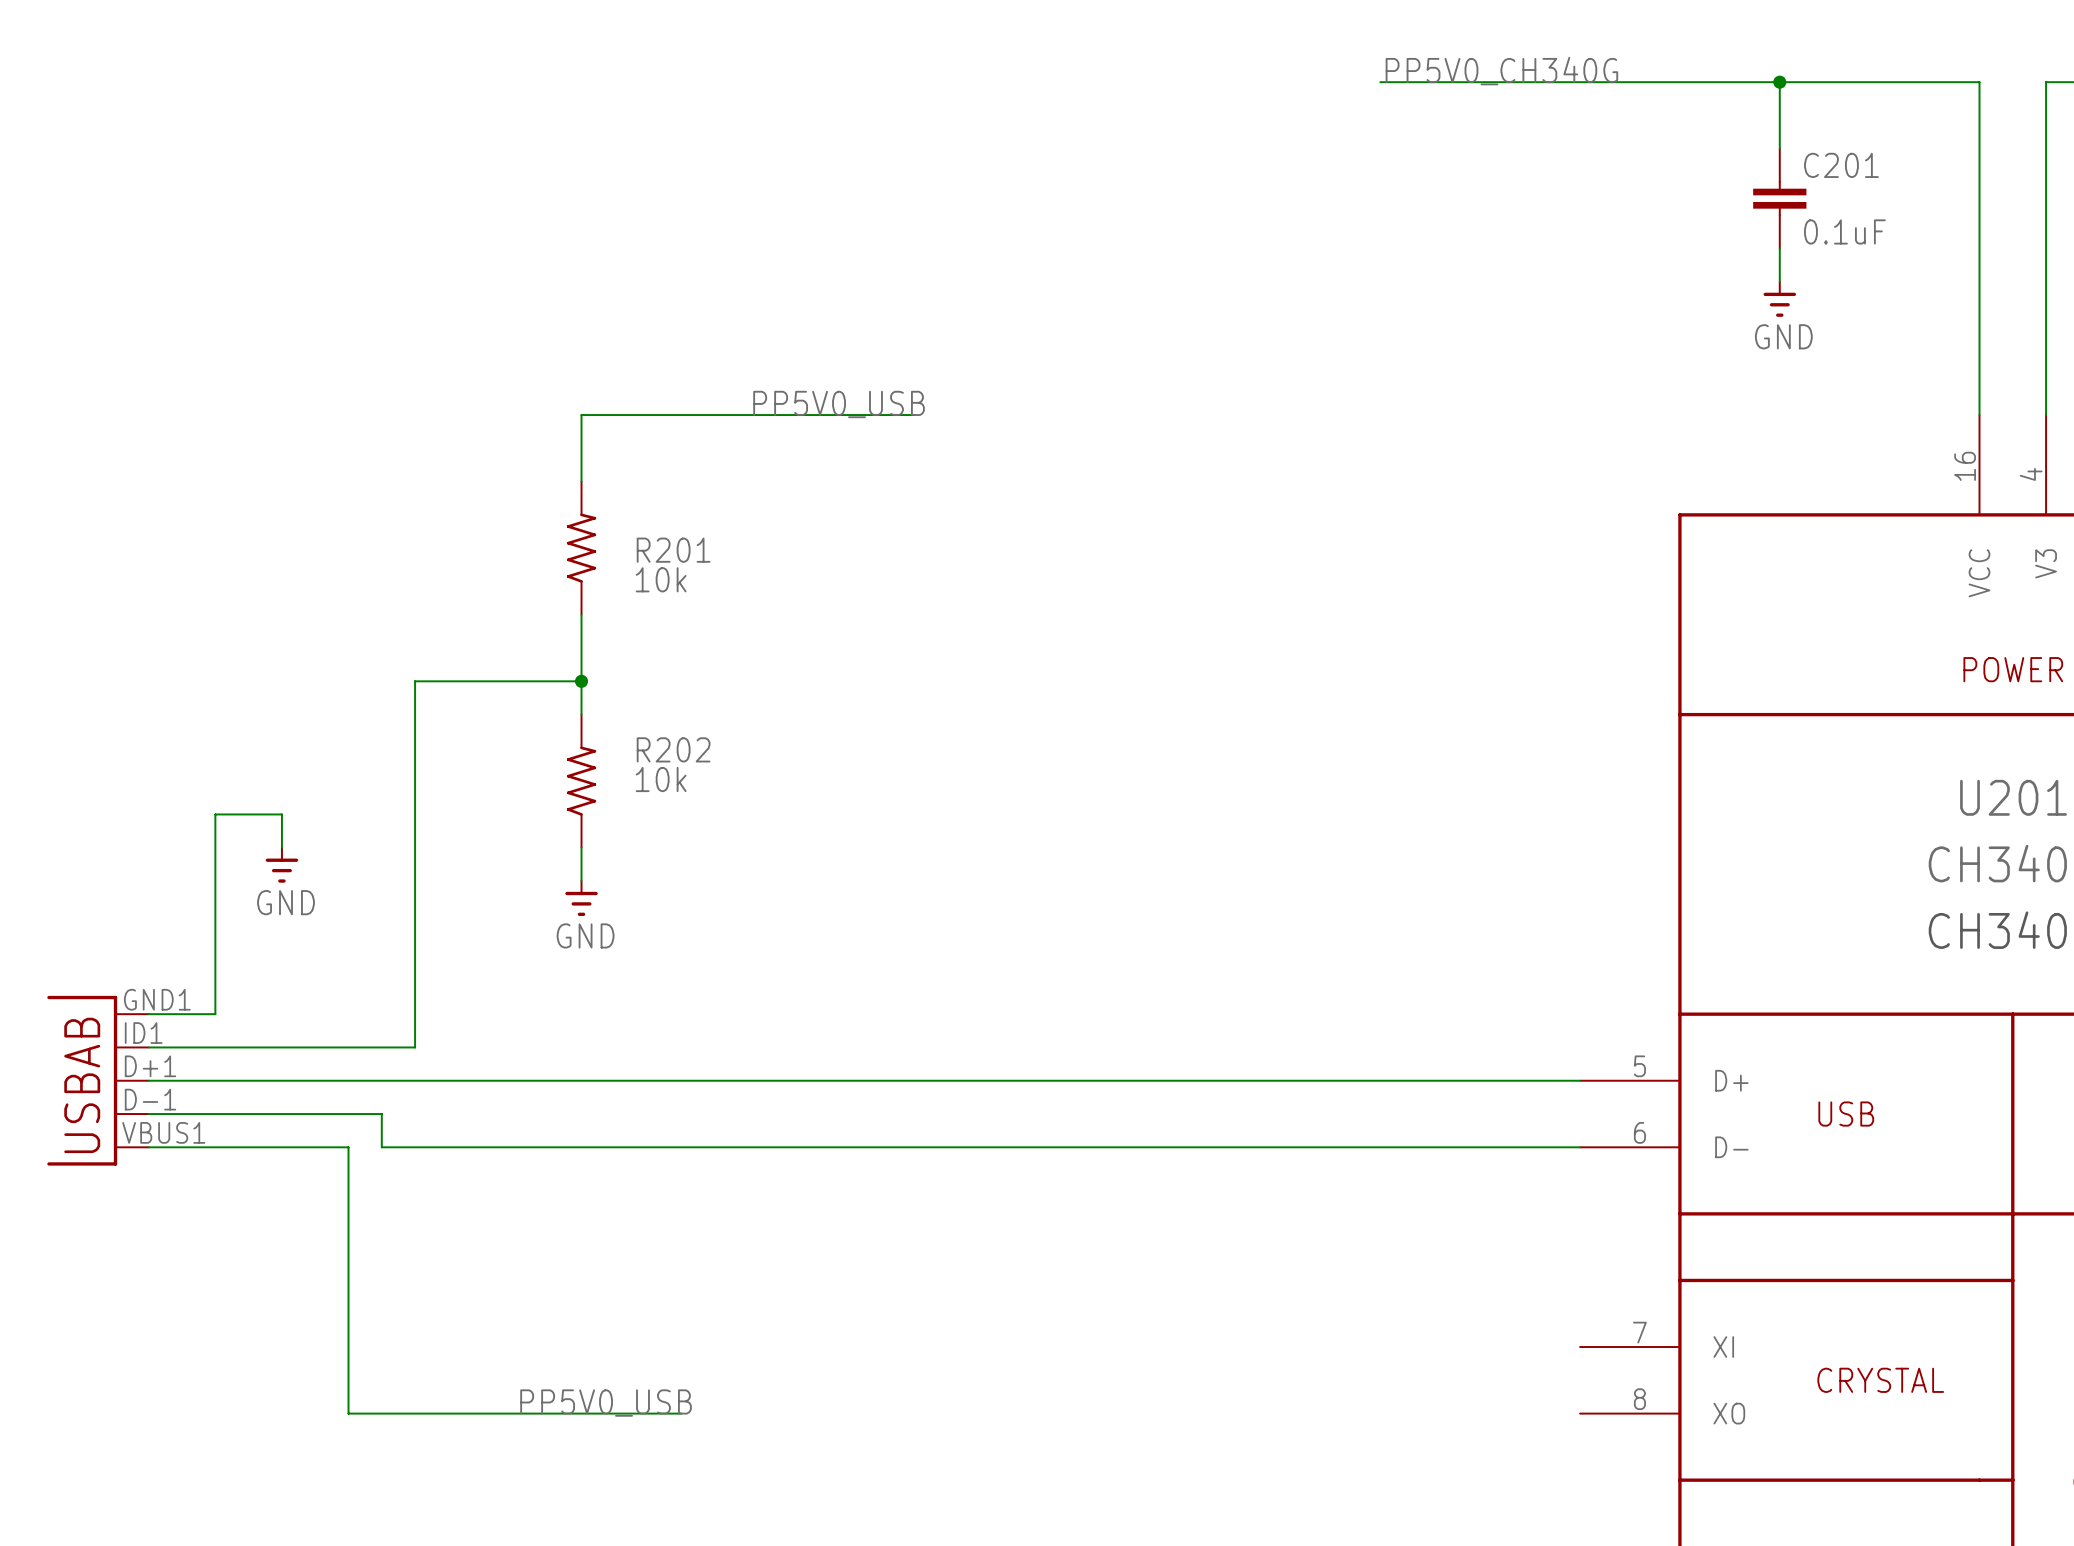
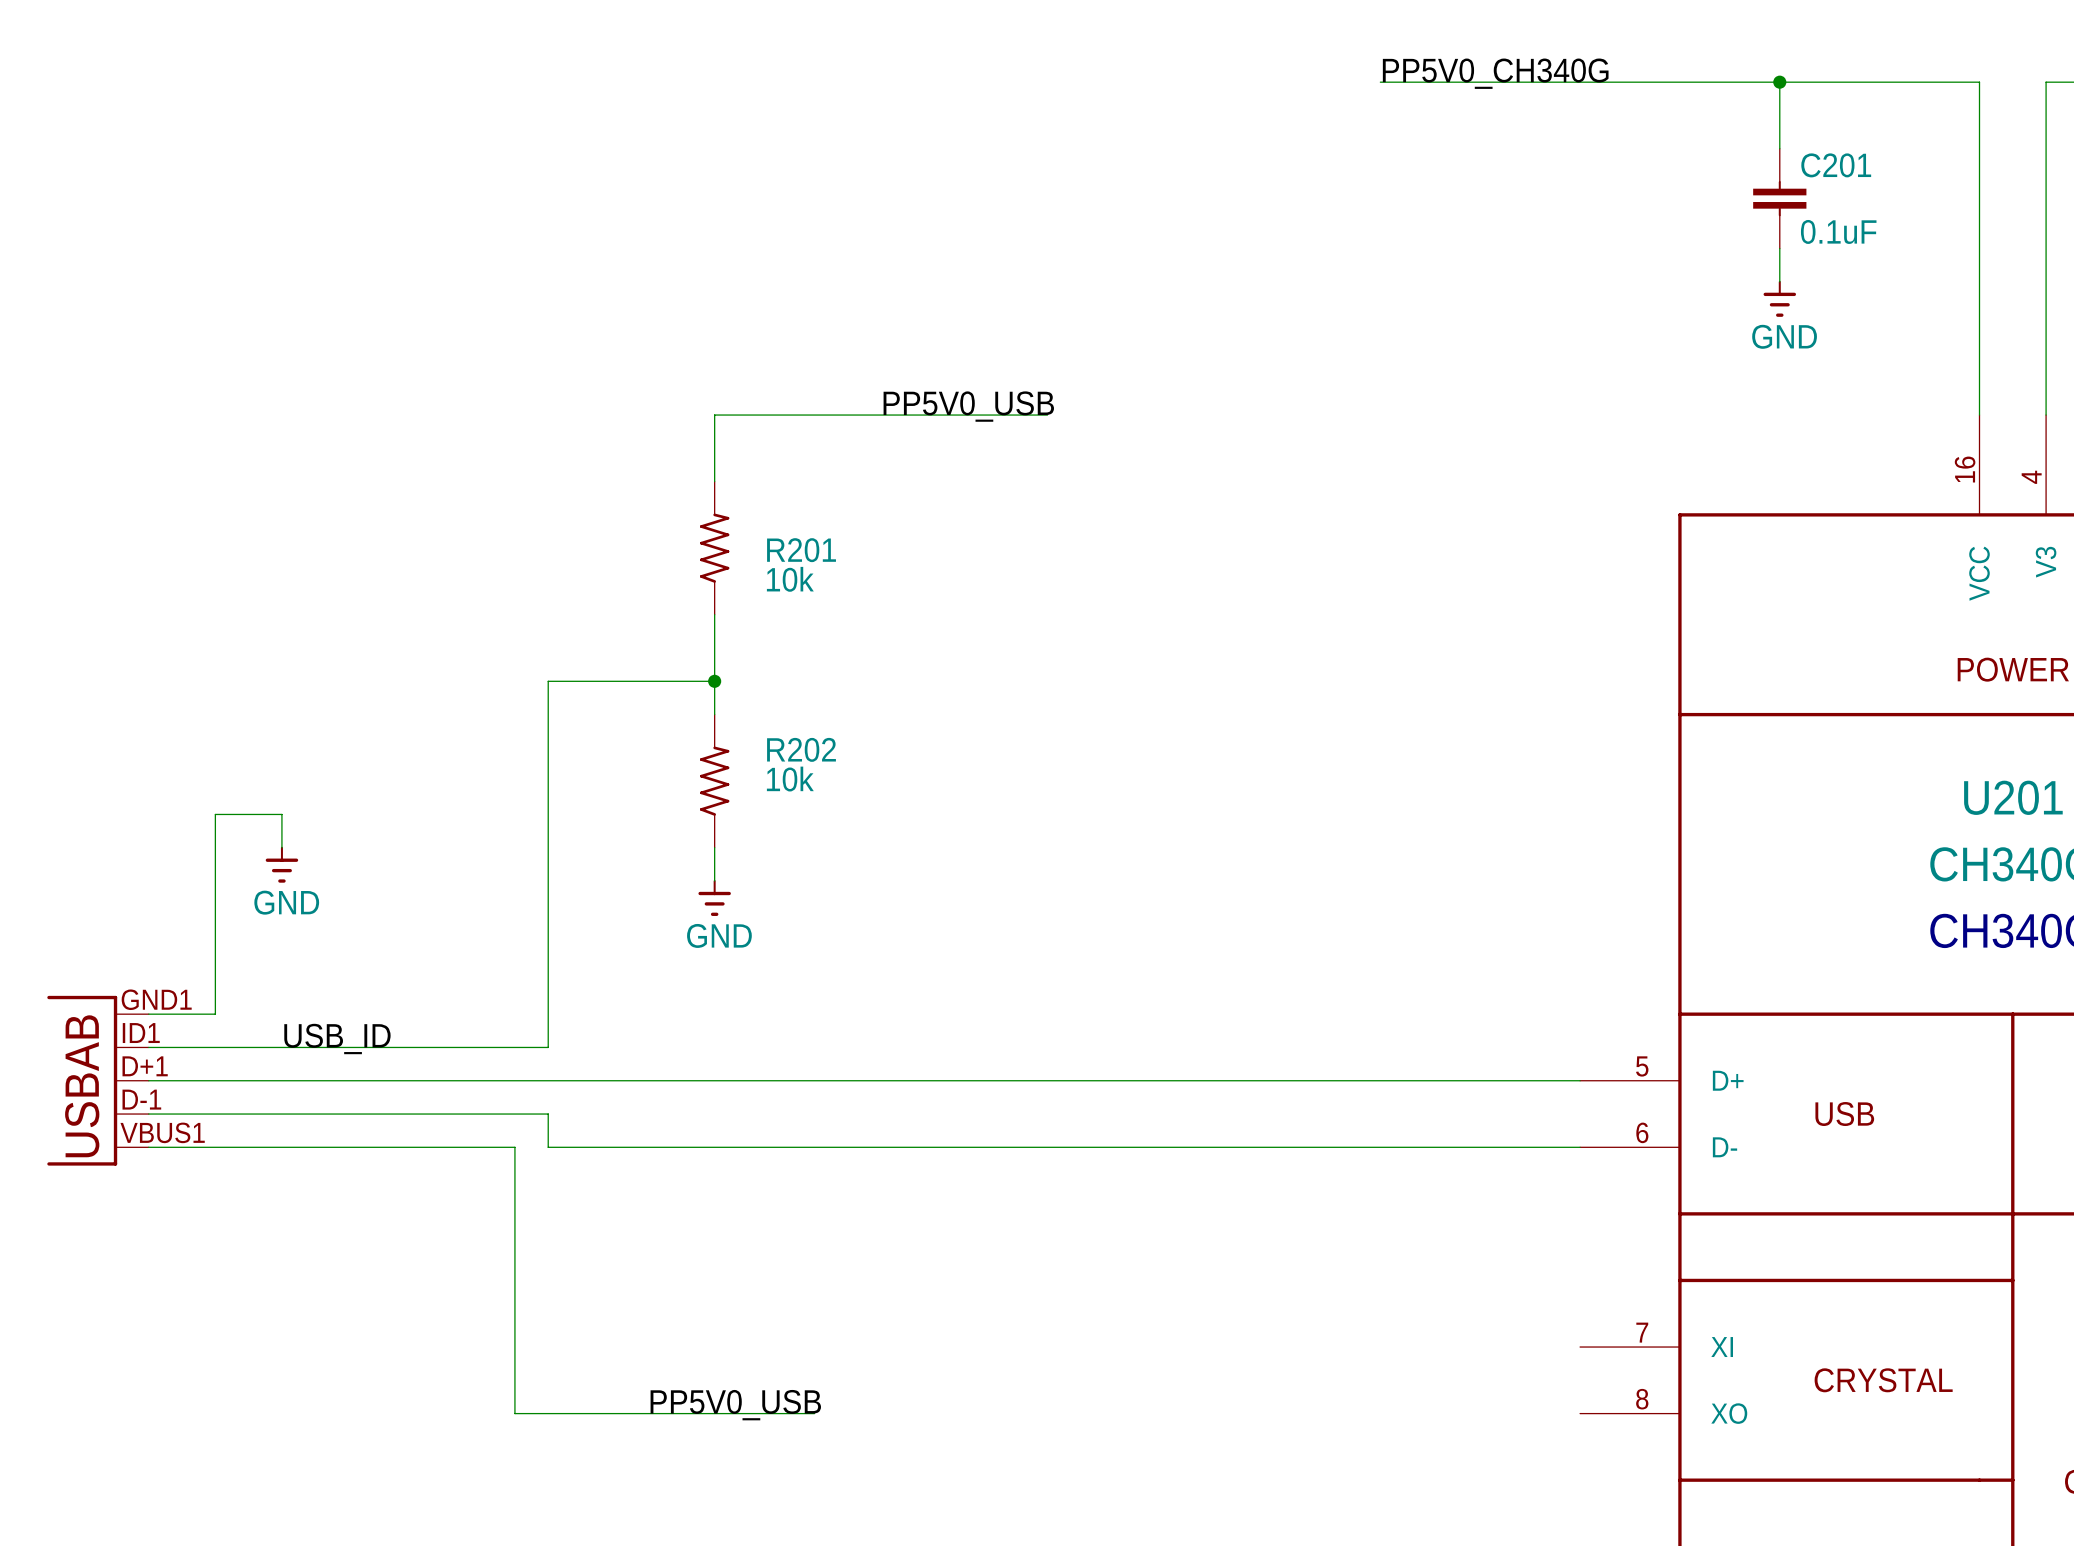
label position: PP5V0_USB (839, 404) -> PP5V0_USB (968, 406)
wire: (714, 415) (581, 415) (581, 481) -> (714, 415) (714, 481)
wire: none -> (914, 415) (1047, 415)
R201 position: (581, 548) -> (714, 548)
wire: (581, 614) (581, 714) -> (714, 614) (714, 714)
wire: (548, 681) (415, 681) (415, 1047) -> (548, 681) (548, 1047) (415, 1047)
wire: none -> (581, 681) (714, 681)
junction: (581, 681) -> none
junction: none -> (714, 681)
R202 position: (581, 781) -> (714, 781)
wire: (581, 847) (581, 881) -> (714, 847) (714, 881)
power symbol position: GND (581, 898) -> GND (714, 898)
label: none -> USB_ID (337, 1038)
wire: (381, 1114) (381, 1147) -> (348, 1147) (381, 1147)
wire: (348, 1147) (348, 1413) (514, 1413) -> (514, 1147) (514, 1413)
wire: (514, 1147) (548, 1147) -> (381, 1114) (548, 1114) (548, 1147)
label position: PP5V0_USB (606, 1403) -> PP5V0_USB (735, 1405)
wire: none -> (681, 1413) (814, 1413)

